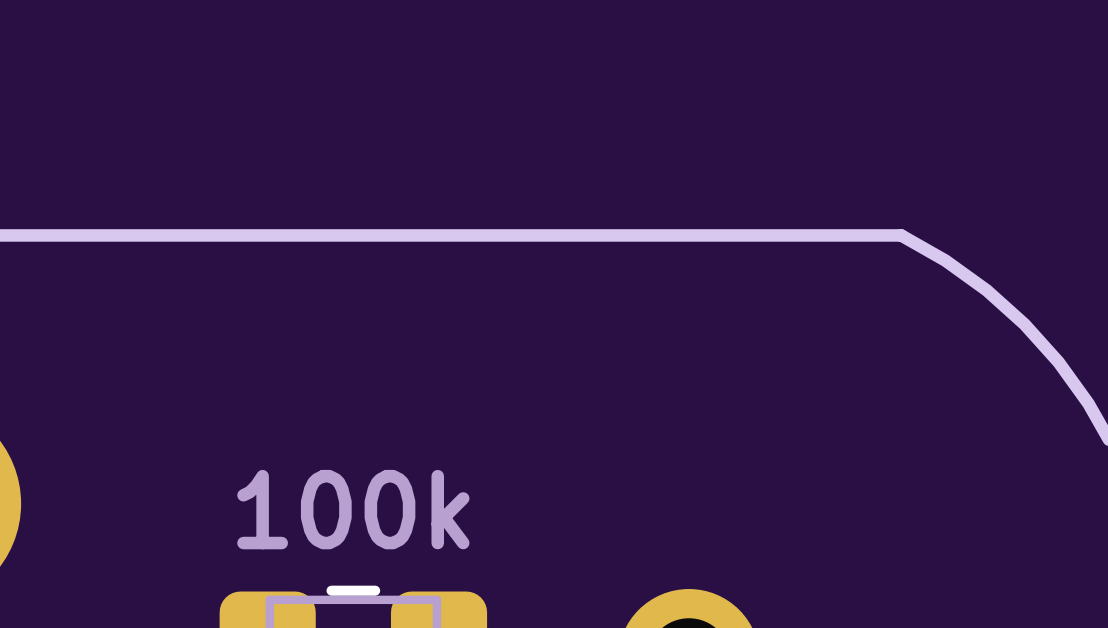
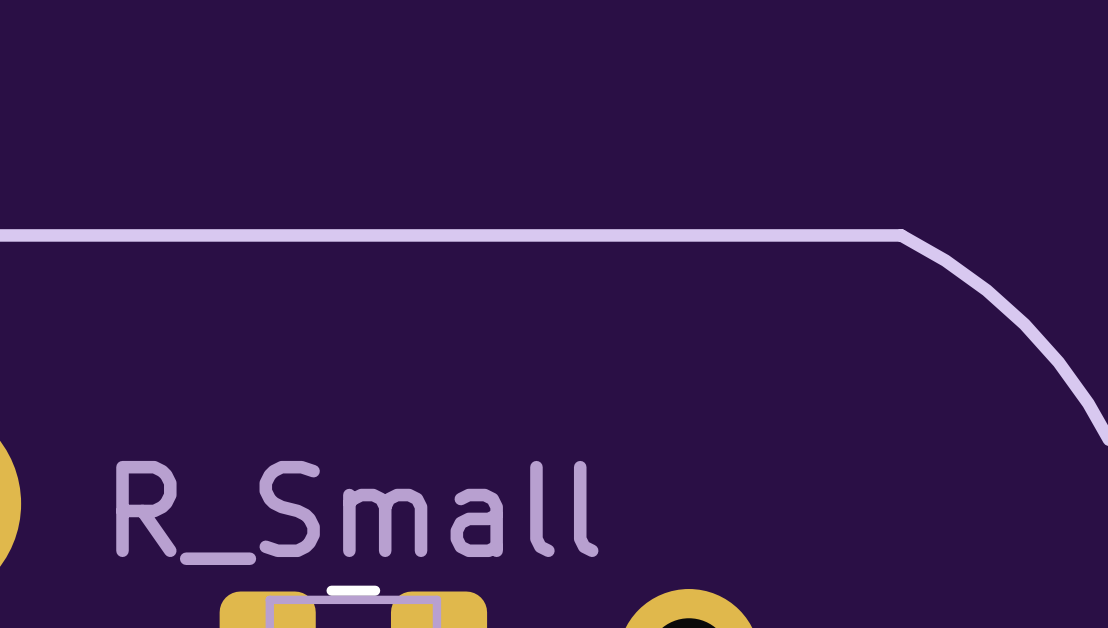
part value: 100k (353, 509) -> R_Small (357, 512)

